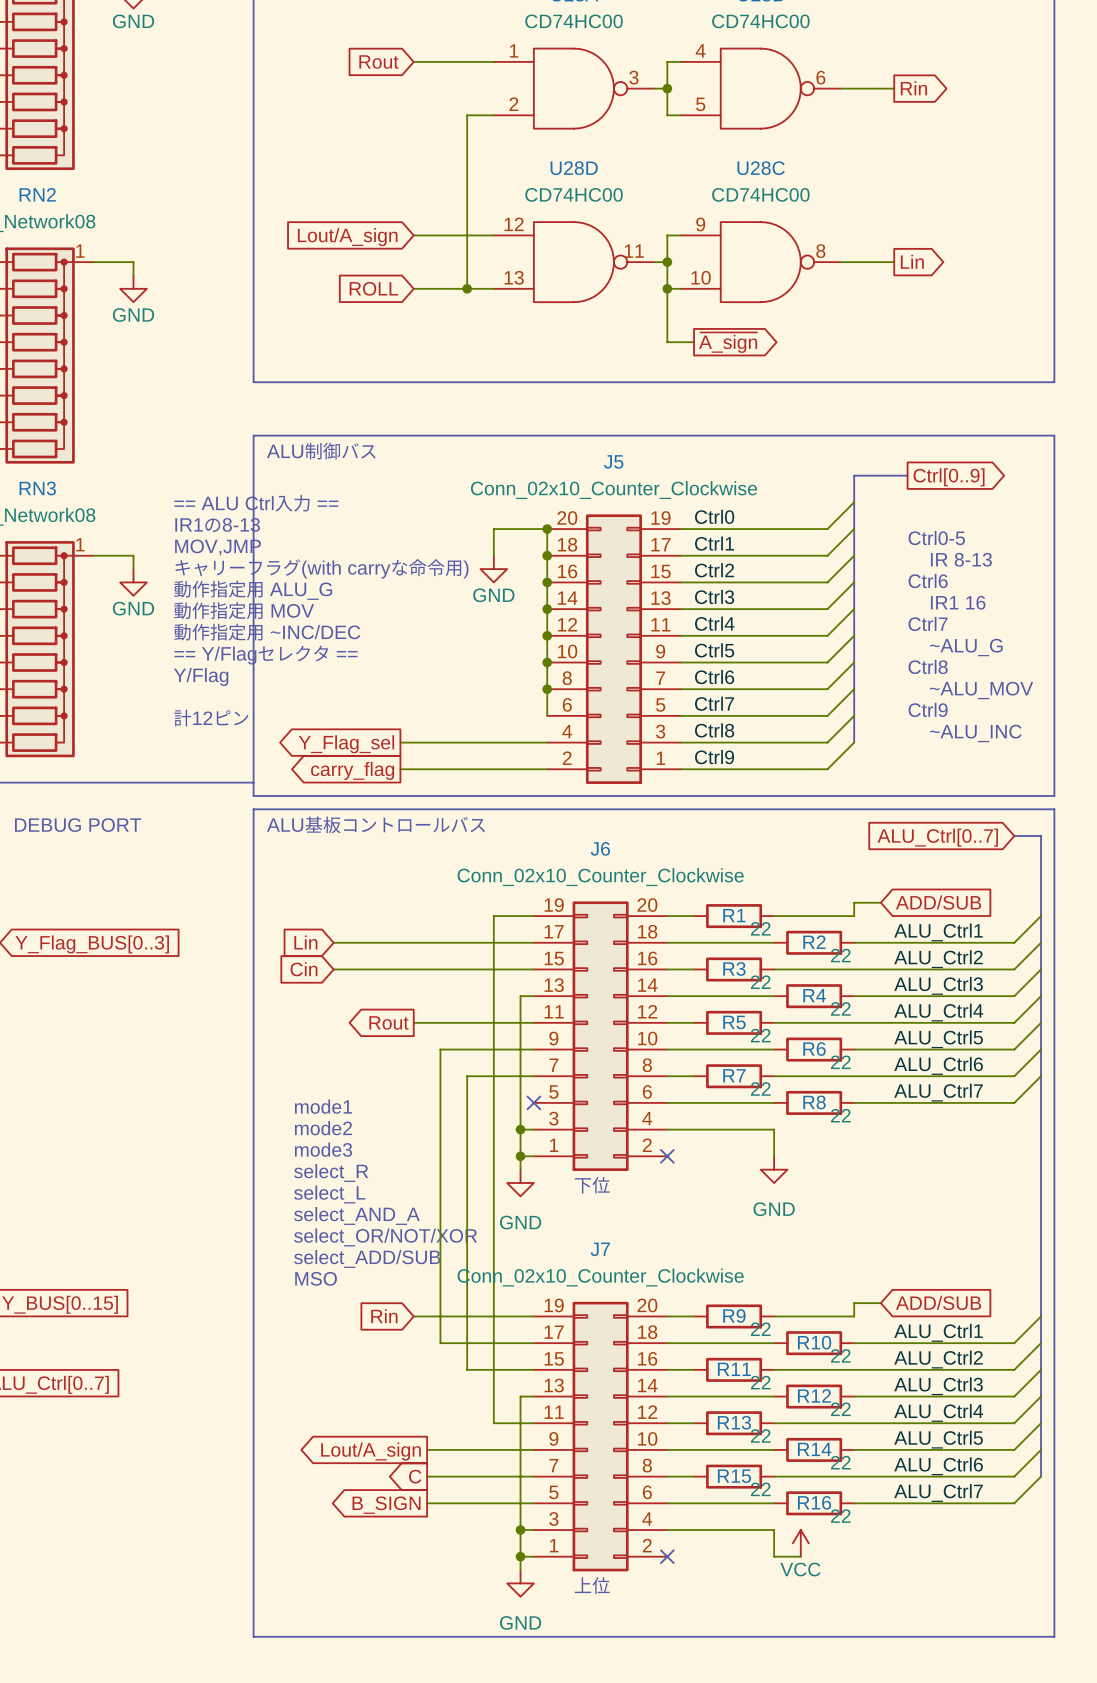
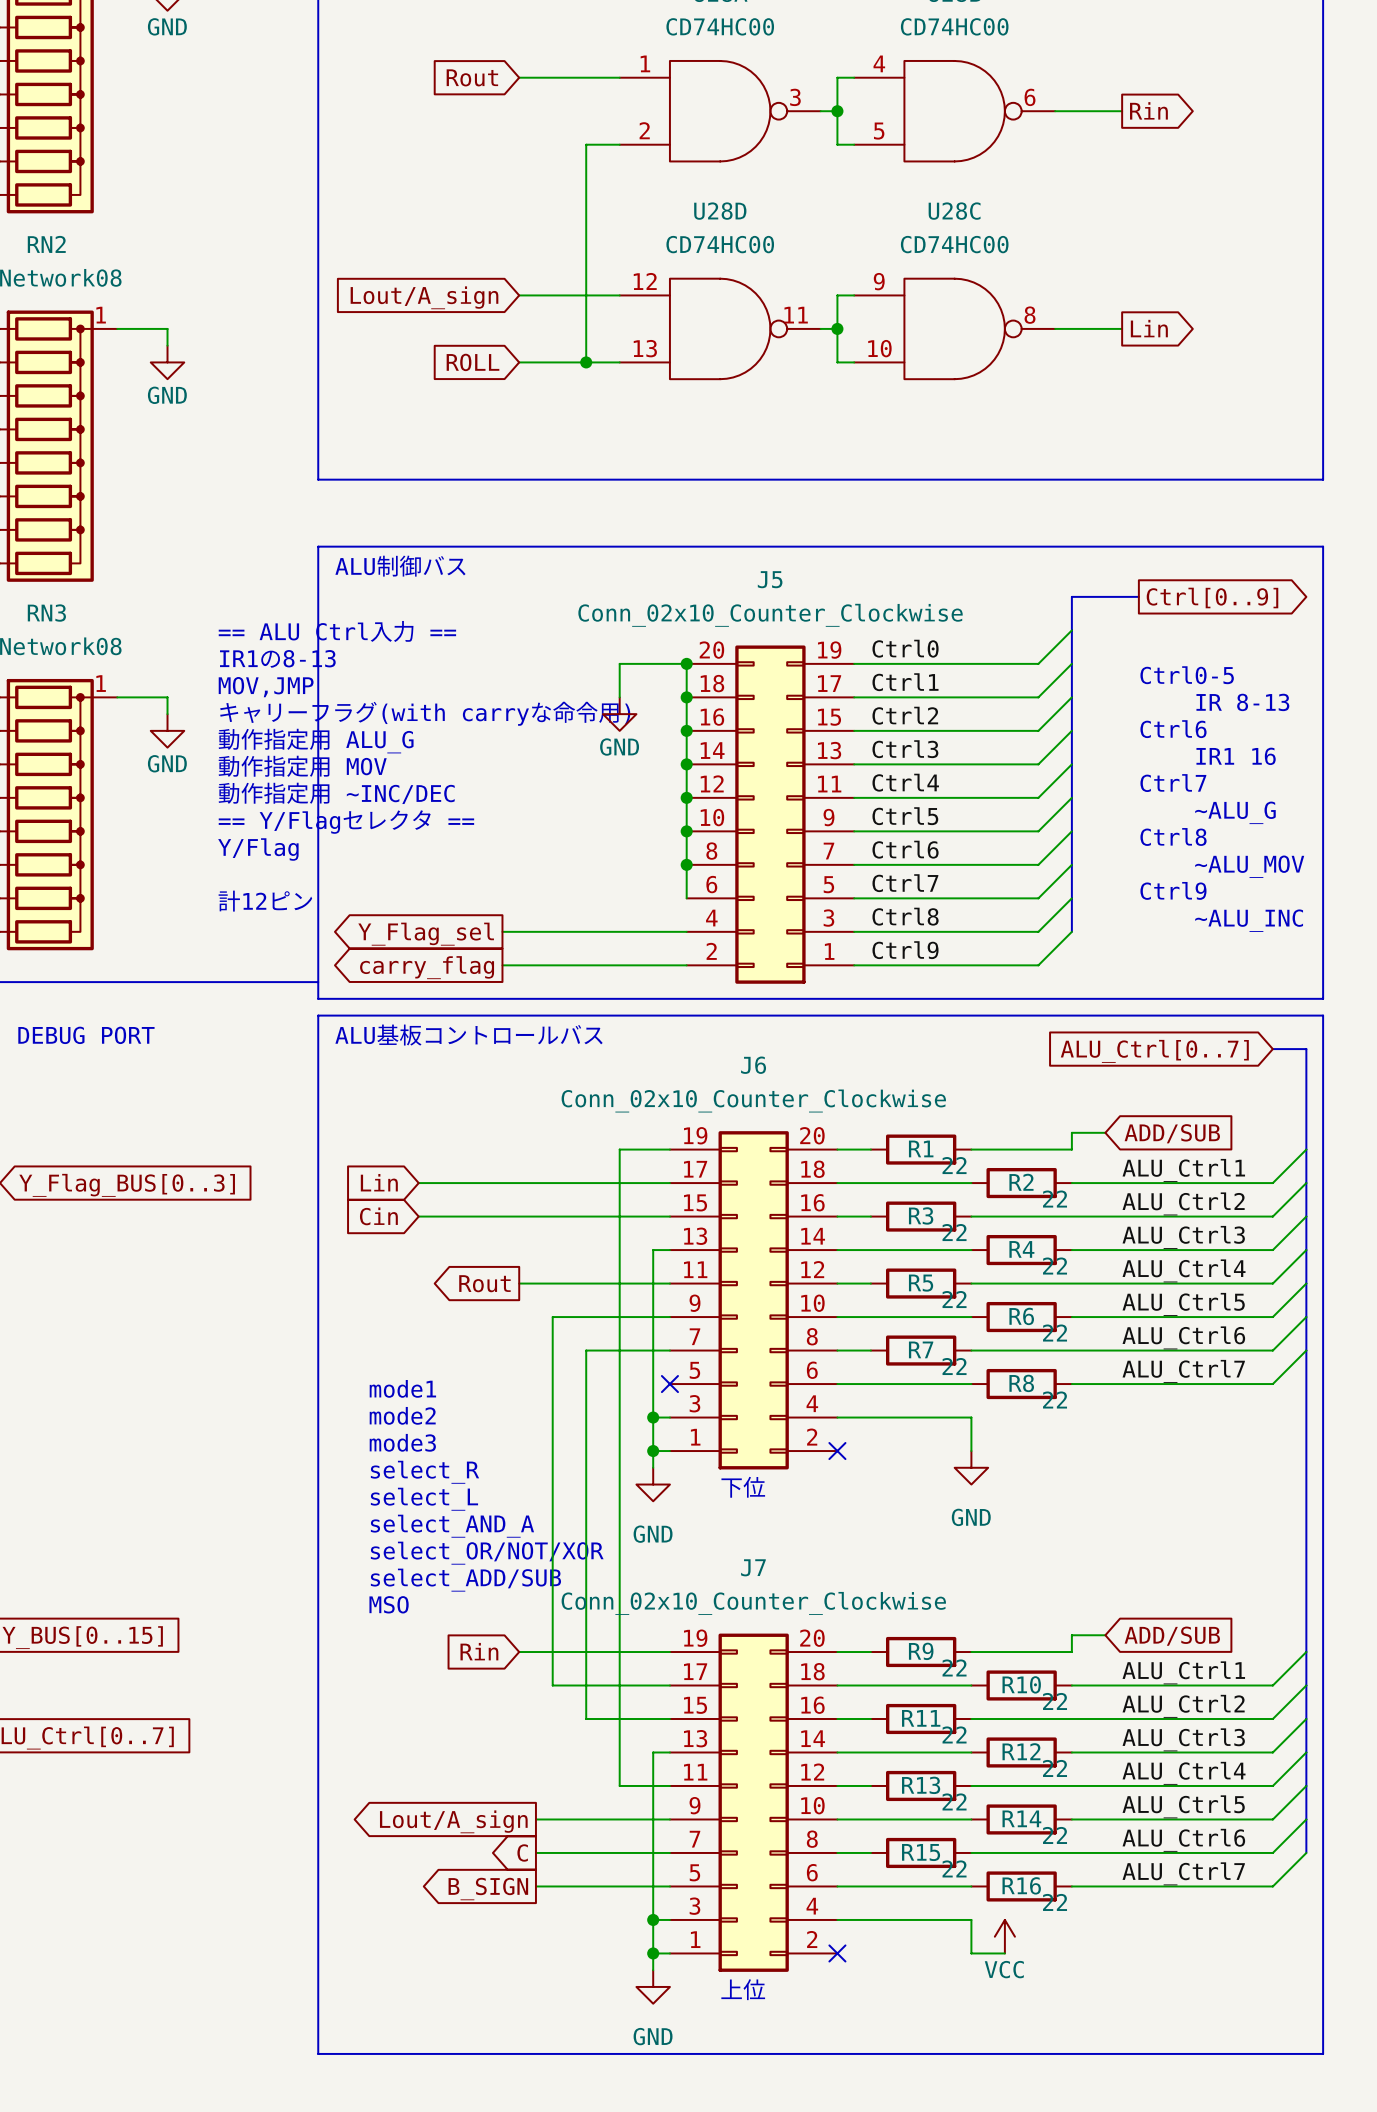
wire: (667, 288) (667, 342) (694, 342) -> none
junction: (667, 288) -> none
global label: ~{A_sign} (728, 342) -> none

